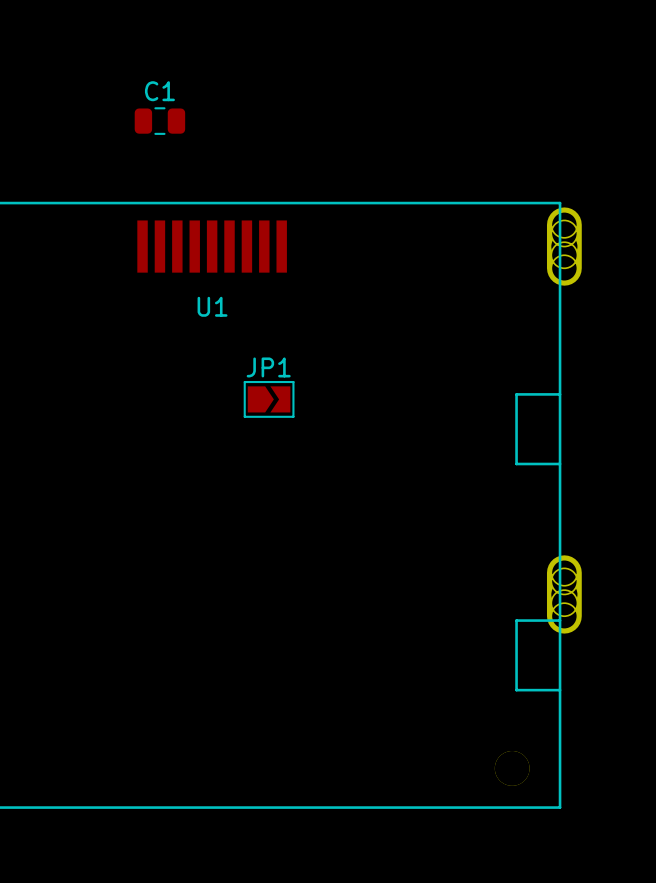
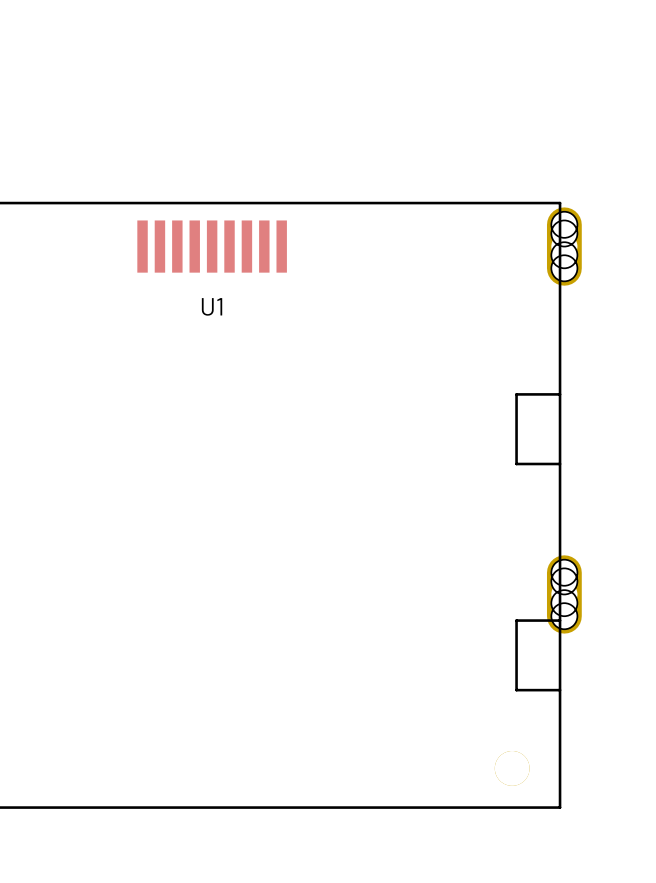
C1: (159, 121) -> none
JP1: (269, 399) -> none

